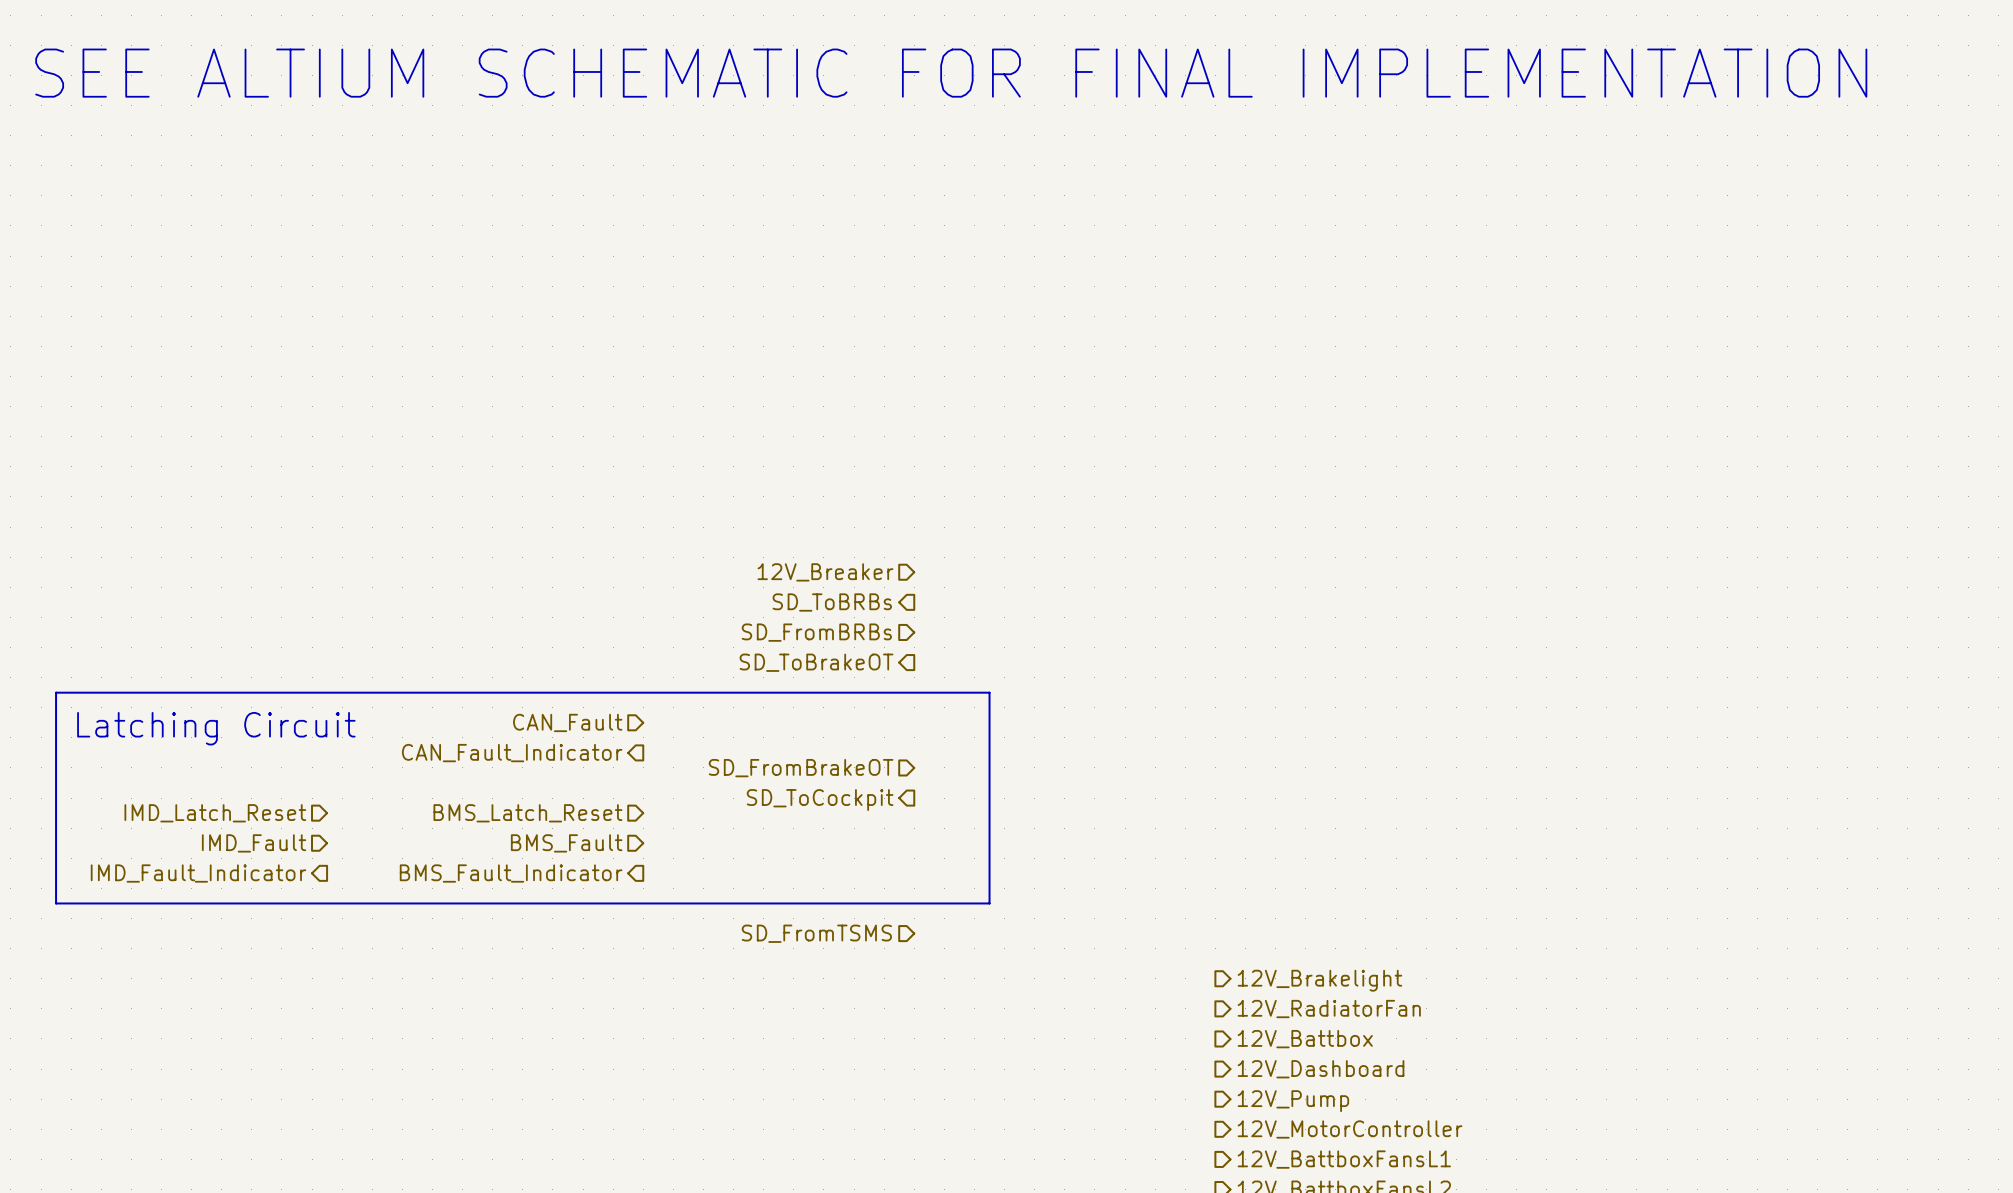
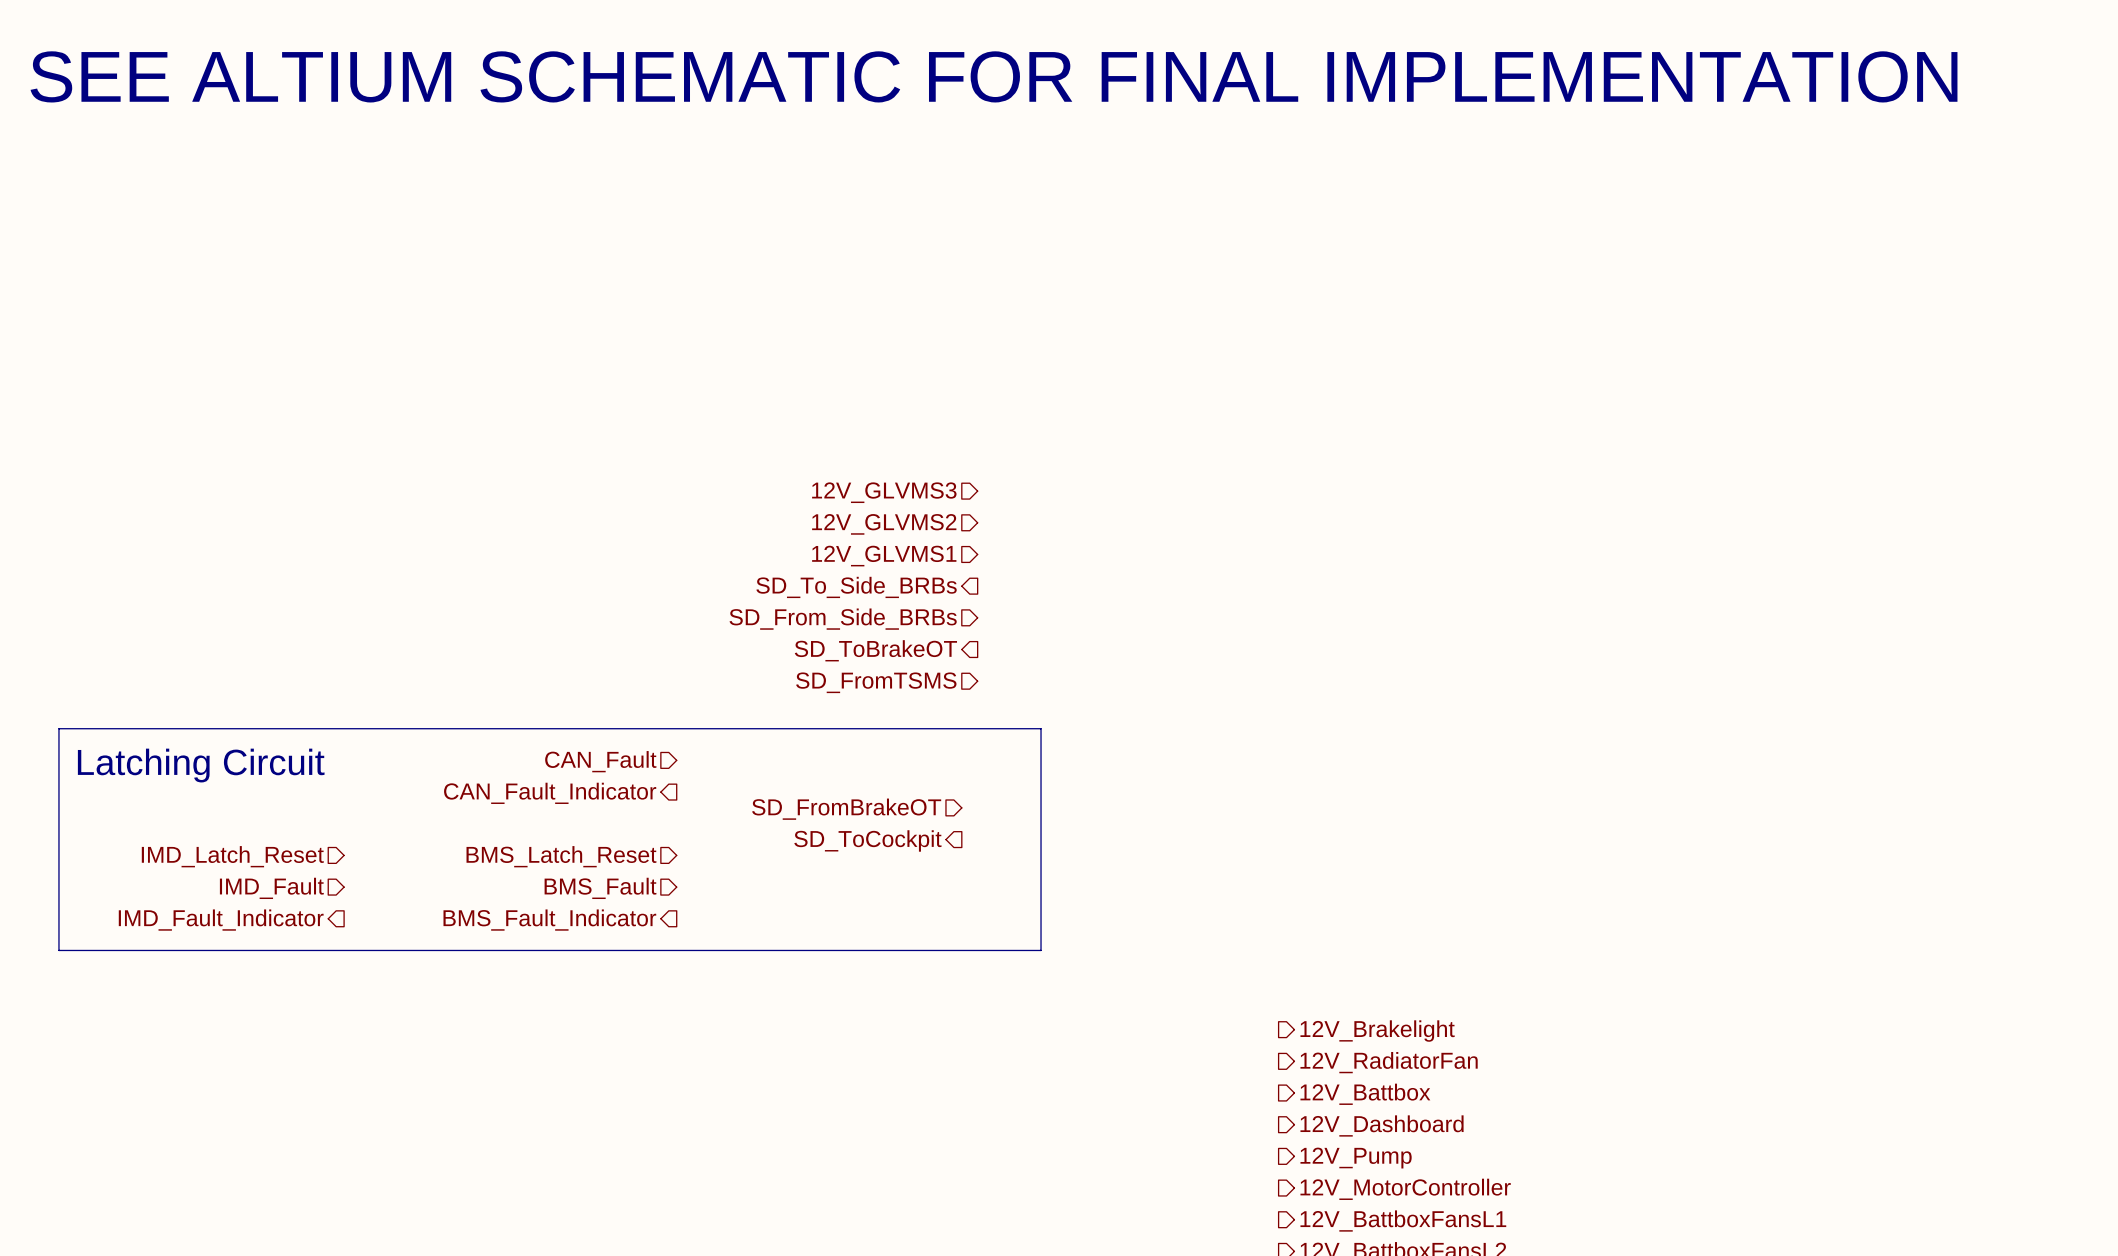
hierarchical label: none -> 12V_GLVMS3 (884, 492)
hierarchical label: none -> 12V_GLVMS2 (884, 524)
hierarchical label: none -> 12V_GLVMS1 (884, 556)
hierarchical label: none -> SD_To_Side_BRBs (856, 587)
hierarchical label: 12V_Breaker (825, 572) -> none
hierarchical label shape: output (832, 602) -> input (843, 619)
hierarchical label: SD_ToBRBs (832, 602) -> SD_From_Side_BRBs (843, 619)
hierarchical label: SD_FromBRBs (816, 632) -> none
hierarchical label position: SD_ToBrakeOT (816, 662) -> SD_ToBrakeOT (875, 650)
hierarchical label position: SD_FromTSMS (816, 933) -> SD_FromTSMS (876, 682)

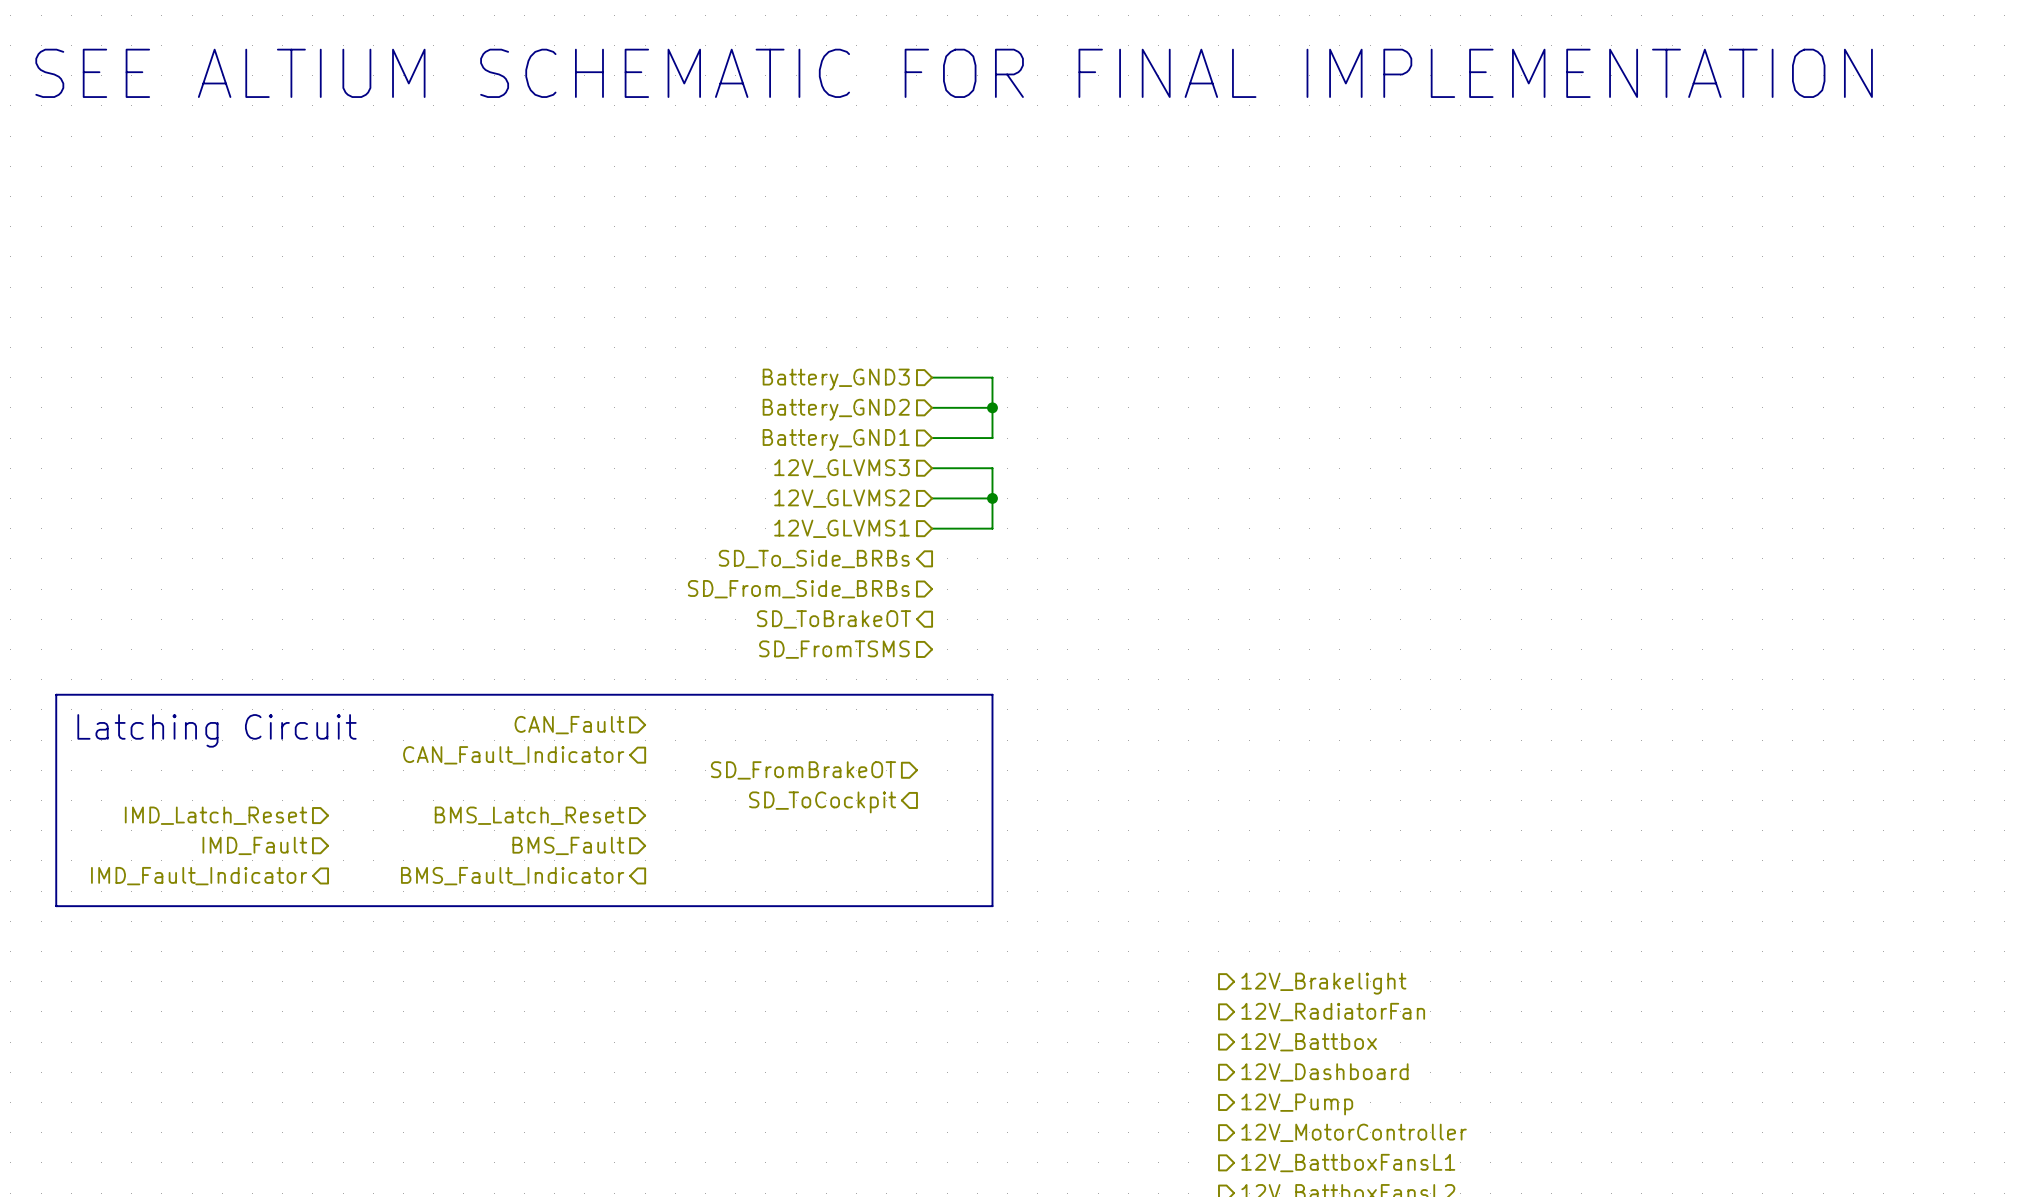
wire: none -> (932, 377) (992, 377) (992, 438) (932, 438)
hierarchical label: none -> Battery_GND3 (836, 379)
wire: none -> (932, 407) (992, 407)
junction: none -> (992, 407)
hierarchical label: none -> Battery_GND2 (836, 409)
hierarchical label: none -> Battery_GND1 (836, 439)
wire: none -> (932, 468) (992, 468) (992, 528) (932, 528)
wire: none -> (932, 498) (992, 498)
junction: none -> (992, 498)

